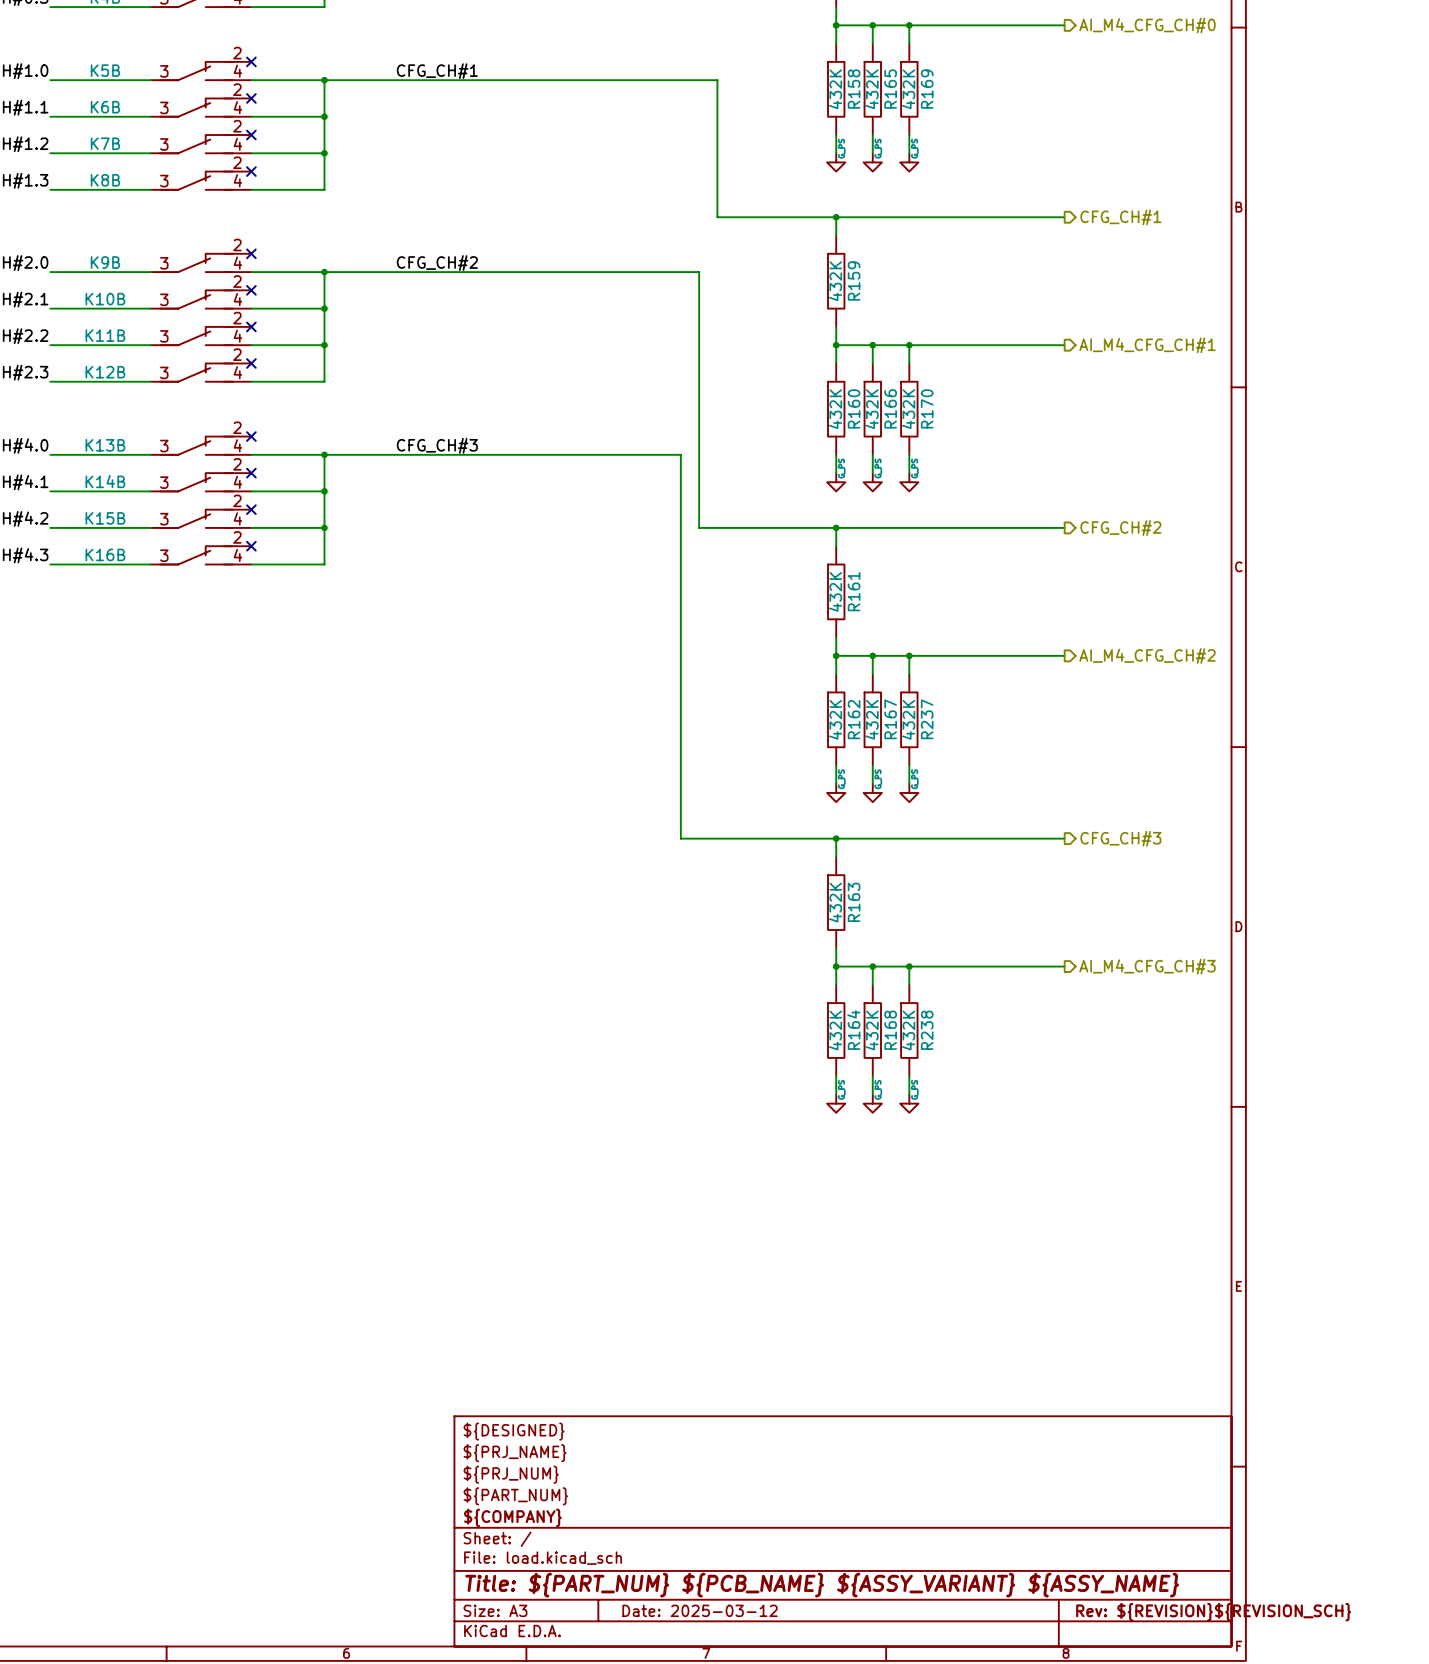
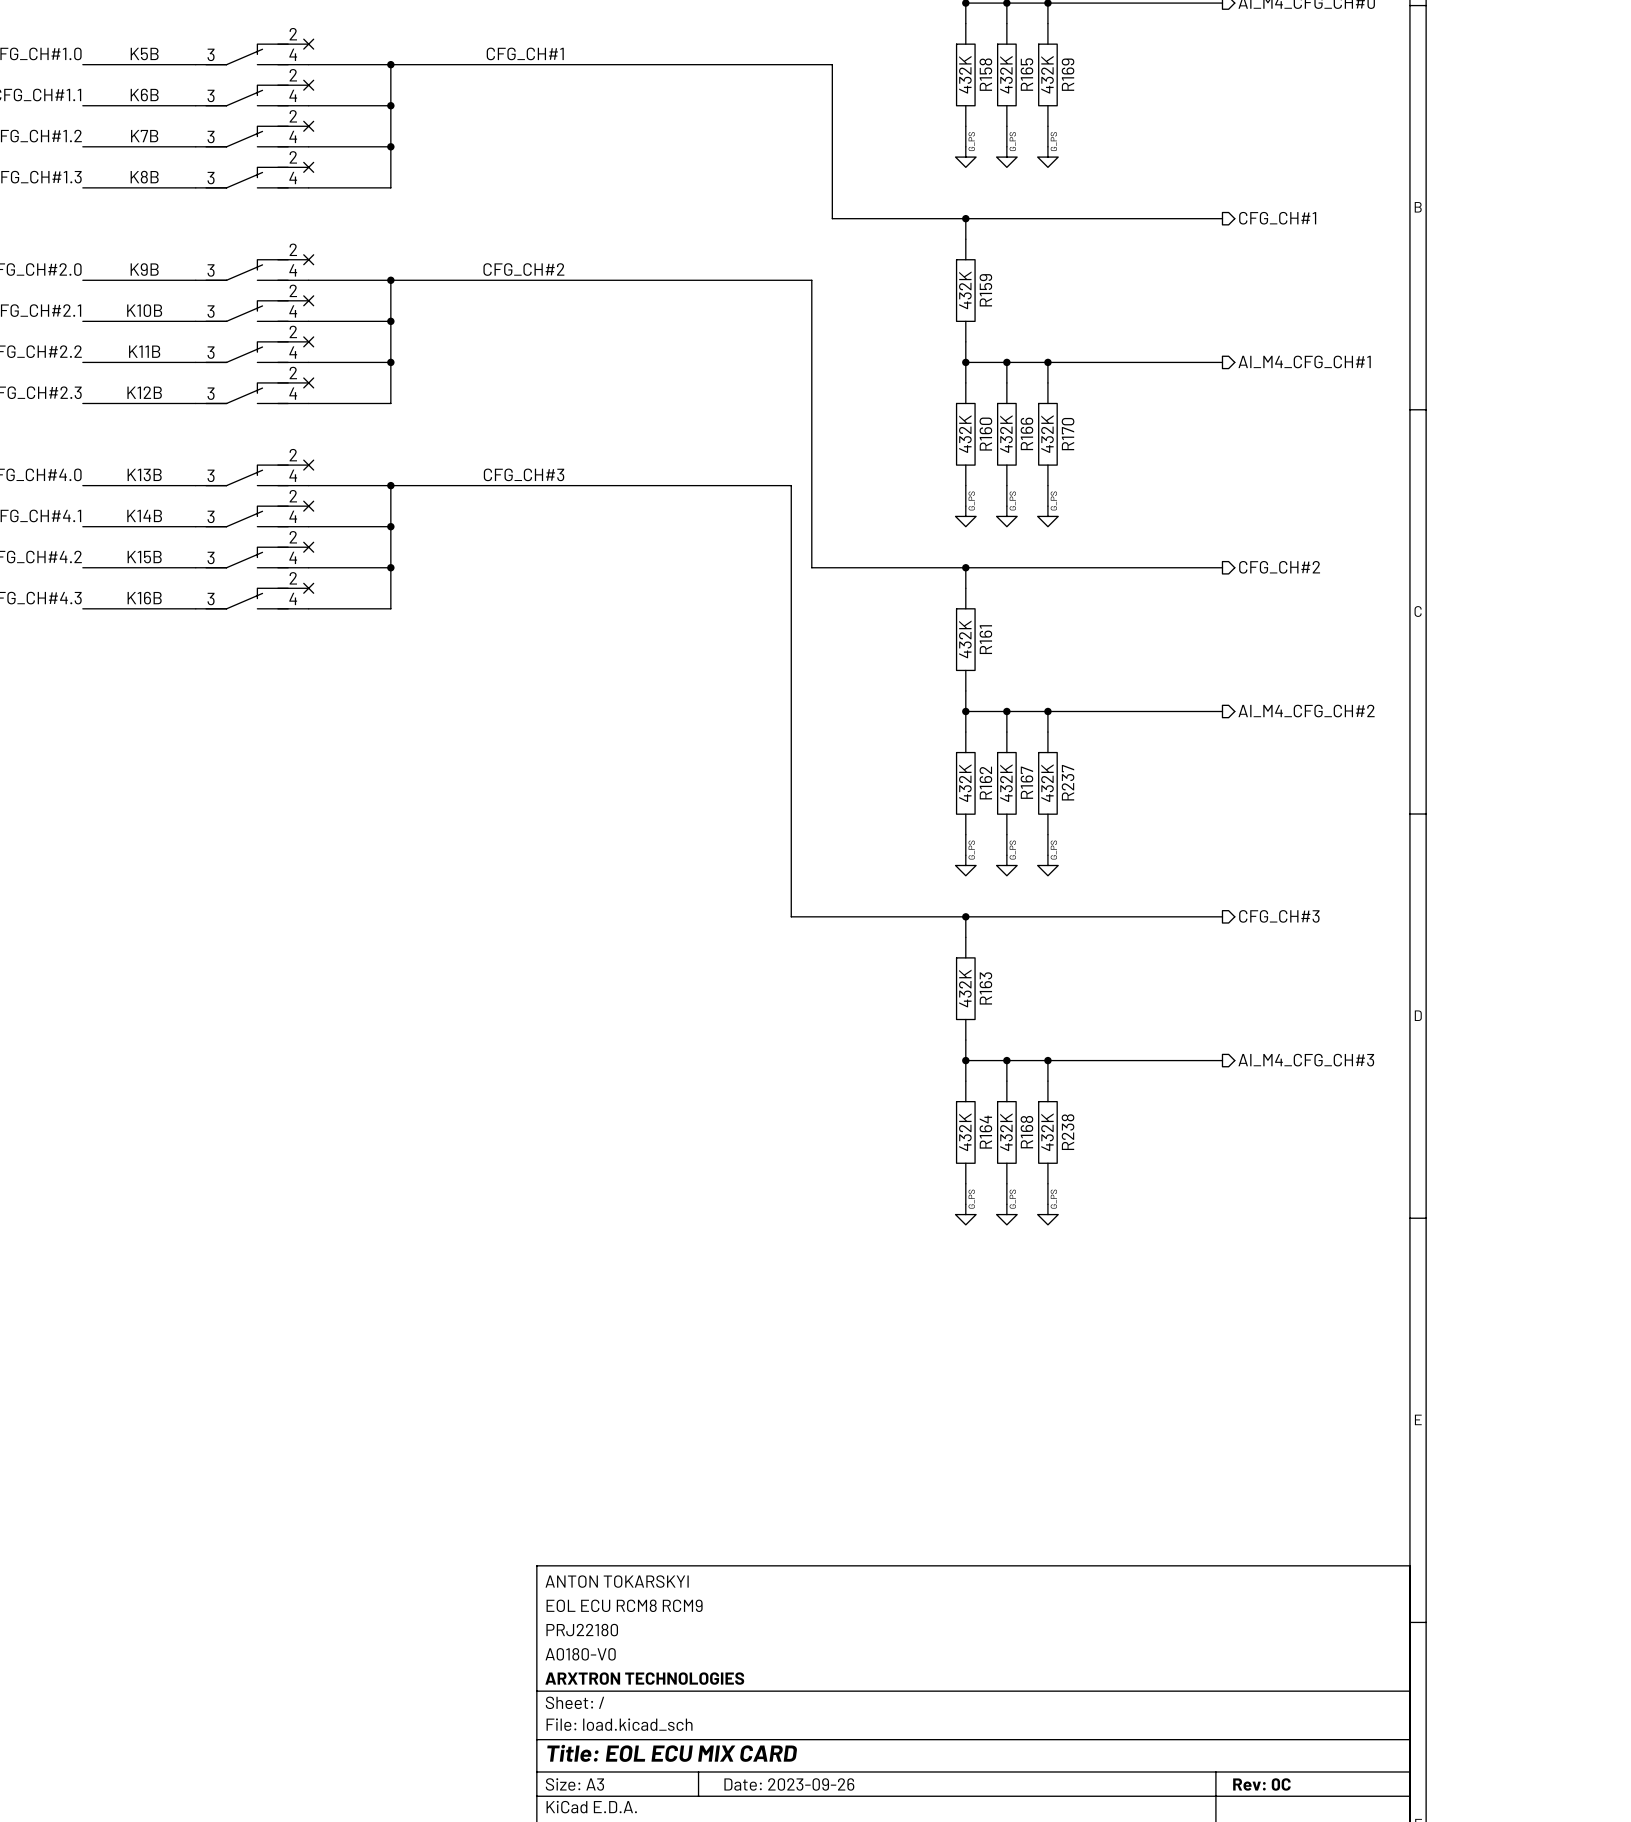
title block: ${DESIGNED} (514, 1431) -> ANTON TOKARSKYI (617, 1581)
title block: ${PRJ_NAME} (515, 1453) -> EOL ECU RCM8 RCM9 (624, 1605)
title block: ${PRJ_NUM} (511, 1474) -> PRJ22180 (582, 1630)
title block: ${PART_NUM} (515, 1496) -> A0180-V0 (580, 1654)
title block: ${COMPANY} (512, 1517) -> ARXTRON TECHNOLOGIES (644, 1678)
title block: Title: ${PART_NUM} ${PCB_NAME} ${ASSY_VARIANT} ${ASSY_NAME} (822, 1585) -> Title: EOL ECU MIX CARD (672, 1753)
title block: Date: 2025-03-12 (700, 1610) -> Date: 2023-09-26 (789, 1784)
title block: Rev: ${REVISION}${REVISION_SCH} (1213, 1612) -> Rev: 0C (1261, 1784)

